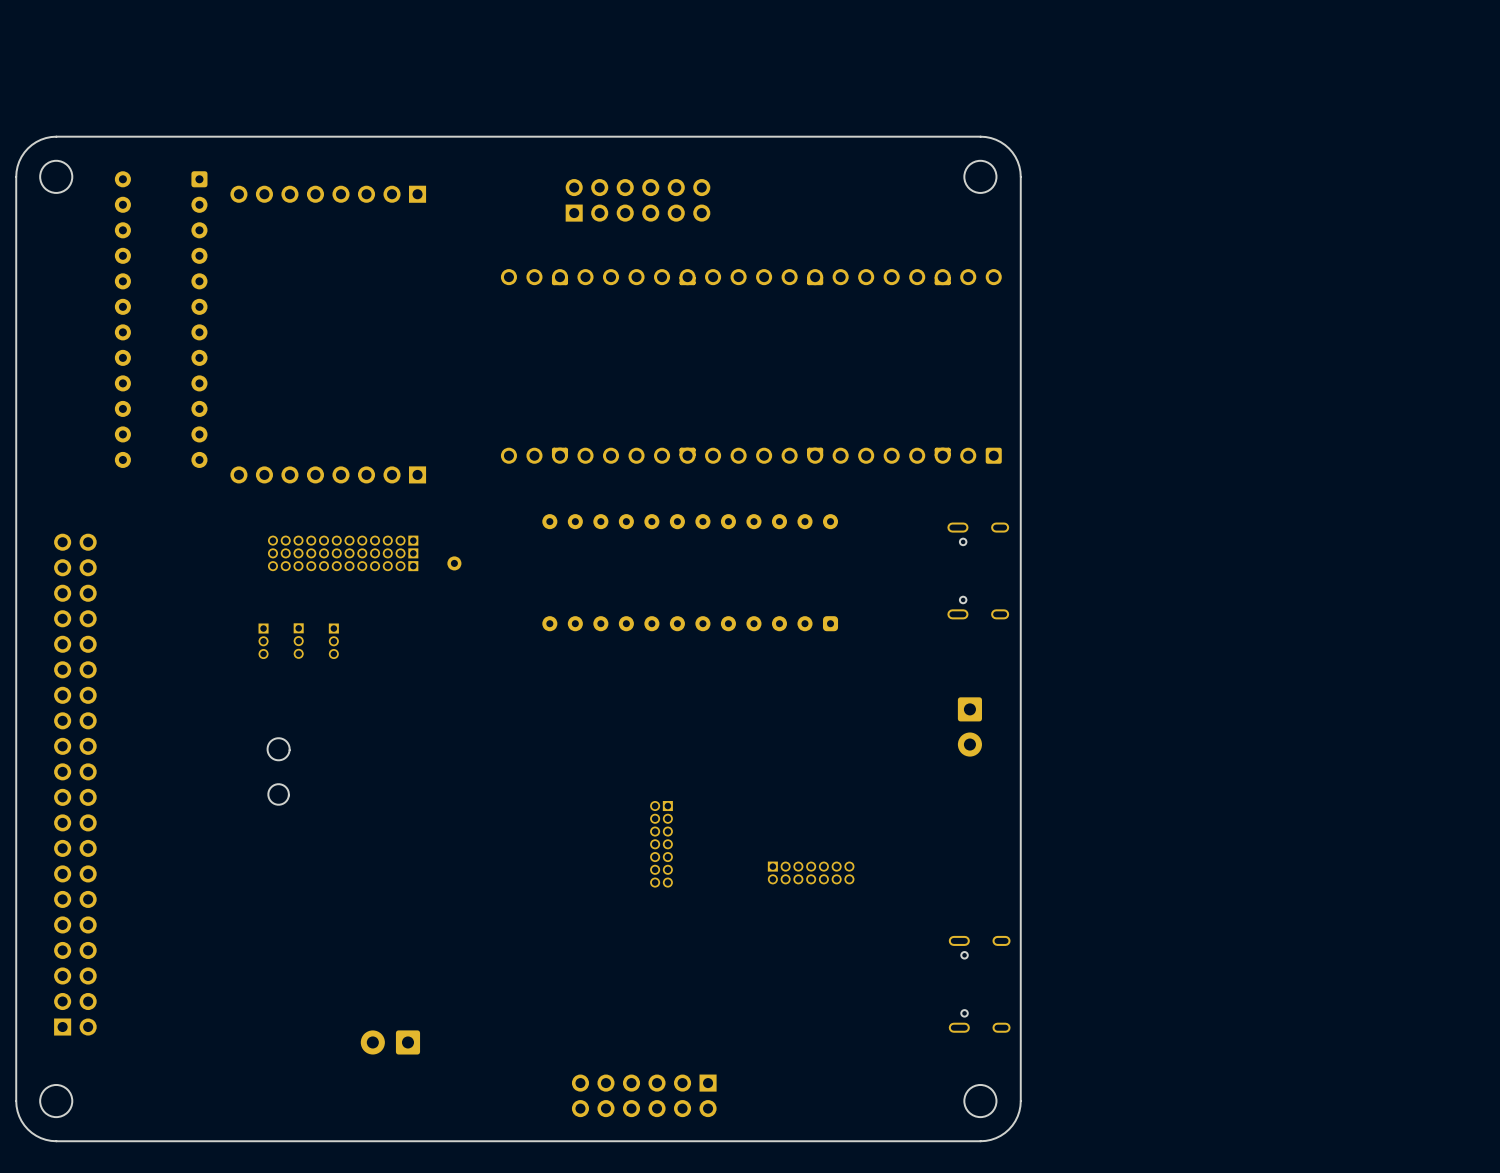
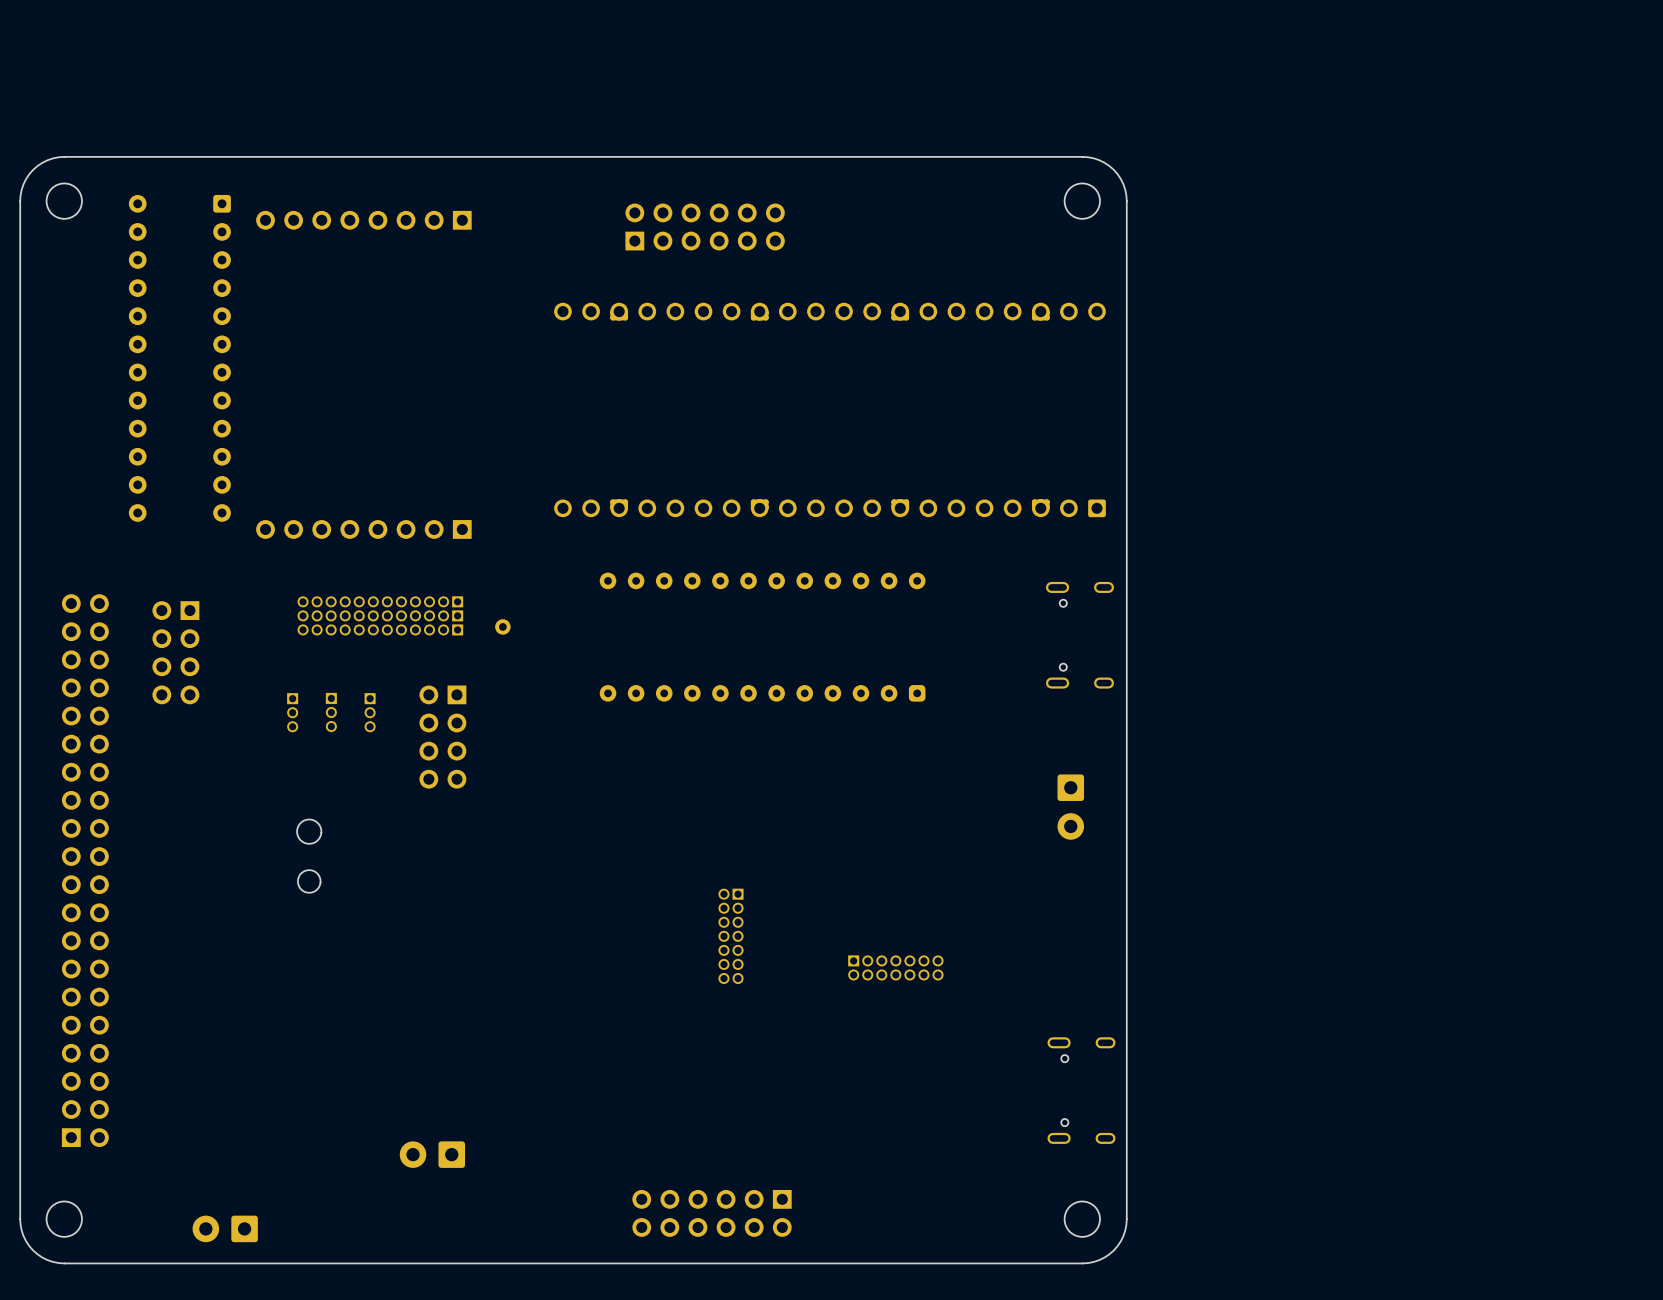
part: none -> (175, 652)
part: none -> (442, 737)
part: none -> (225, 1228)

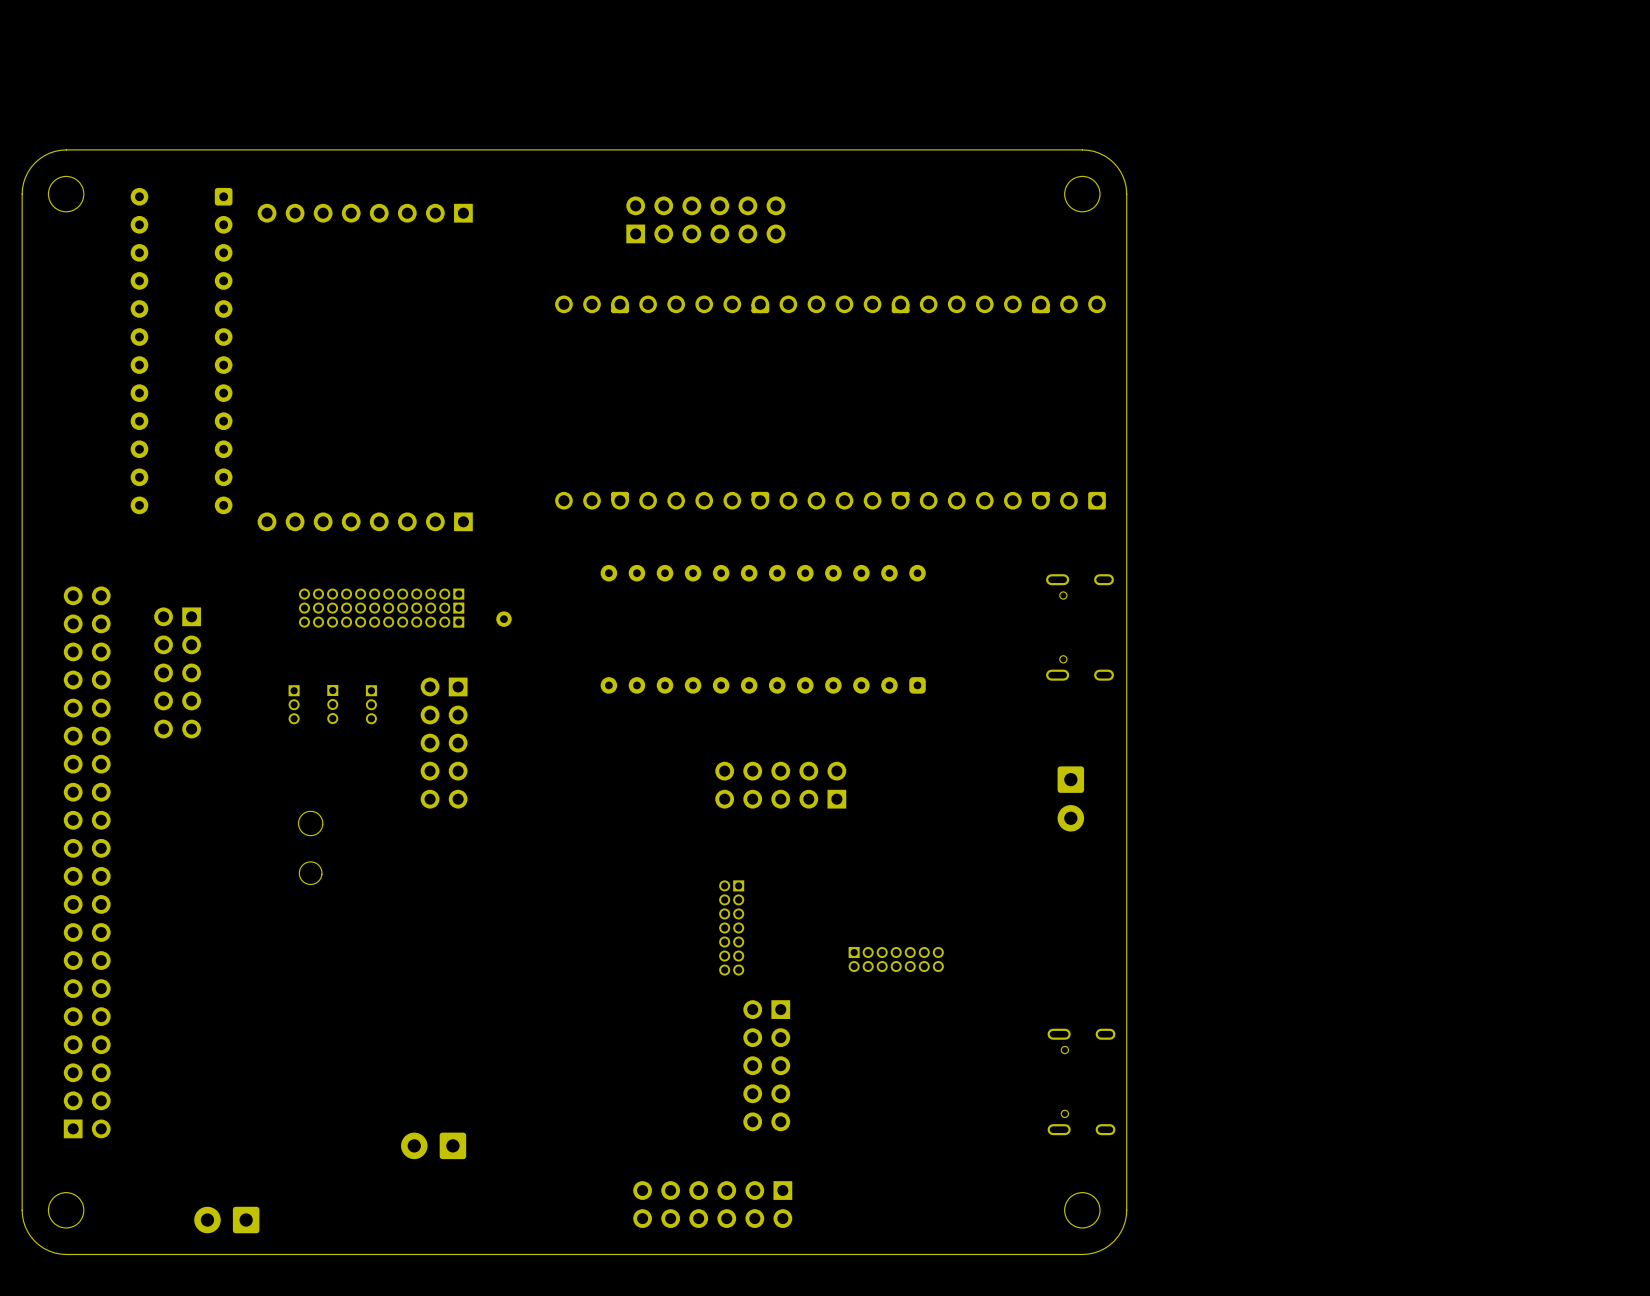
part: (175, 652) -> none
part: none -> (177, 672)
part: none -> (444, 743)
part: none -> (780, 785)
part: none -> (766, 1065)

